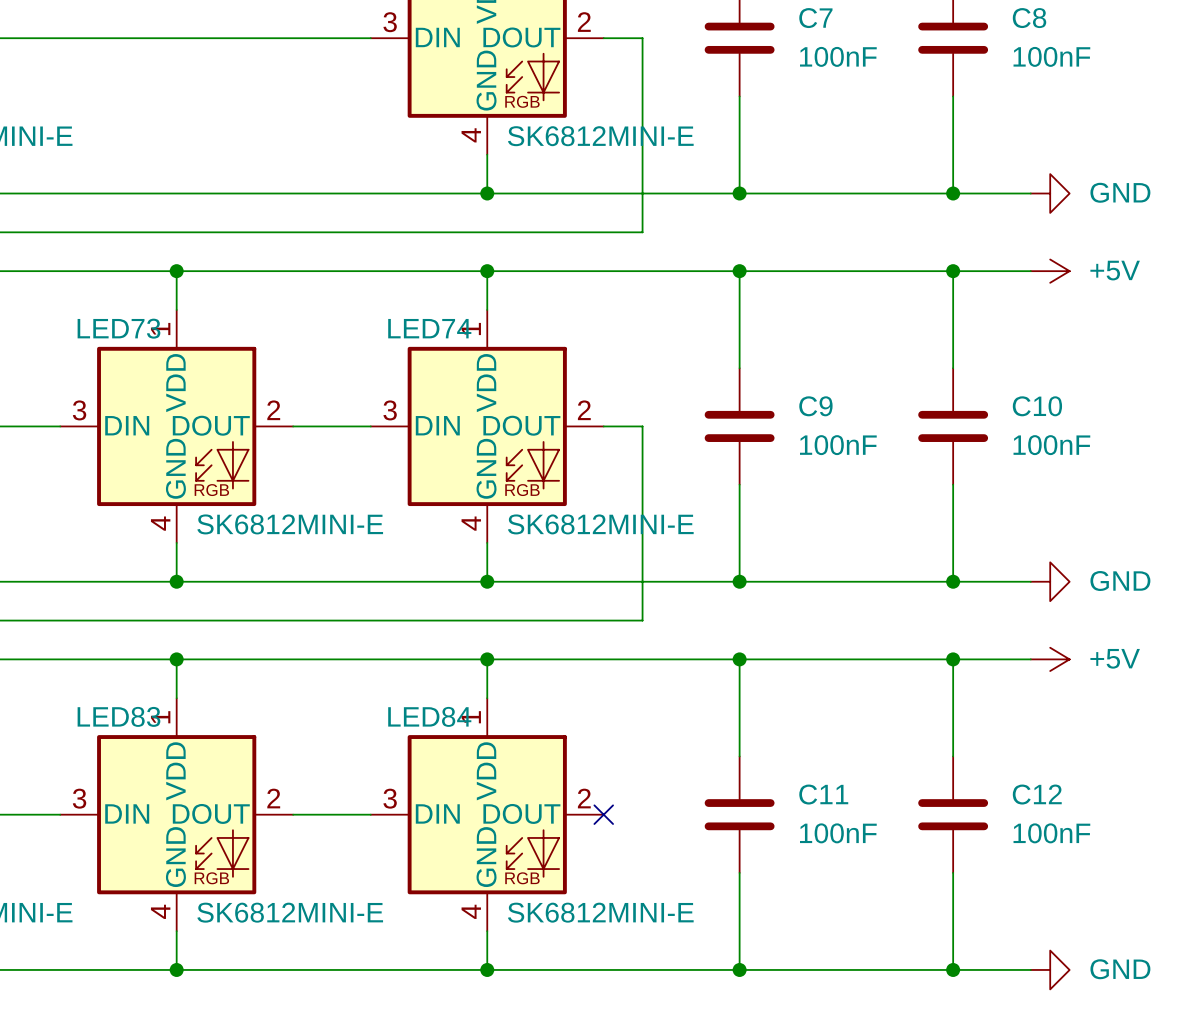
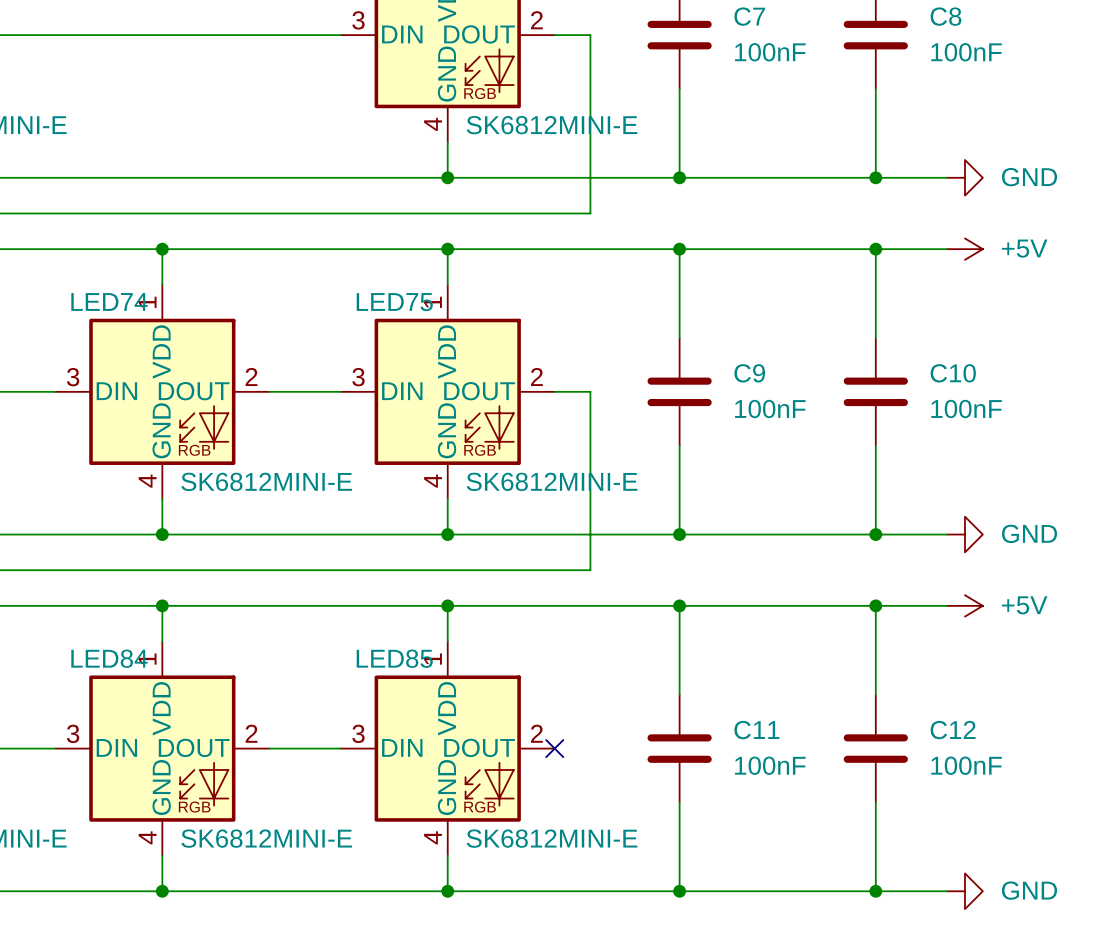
LED73 name: LED73 (118, 328) -> LED74 (109, 301)
LED74 name: LED74 (429, 328) -> LED75 (394, 302)
LED83 name: LED83 (118, 716) -> LED84 (109, 658)
LED84 name: LED84 (429, 716) -> LED85 (394, 658)

